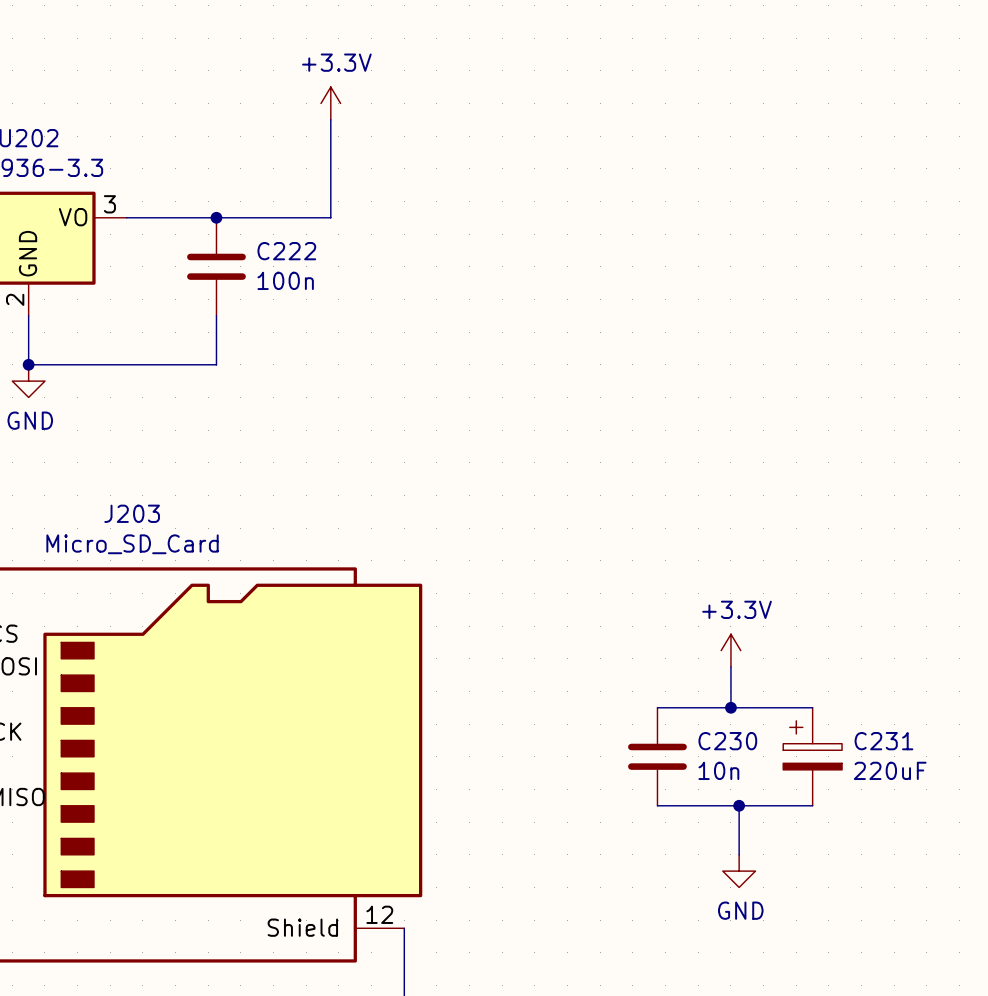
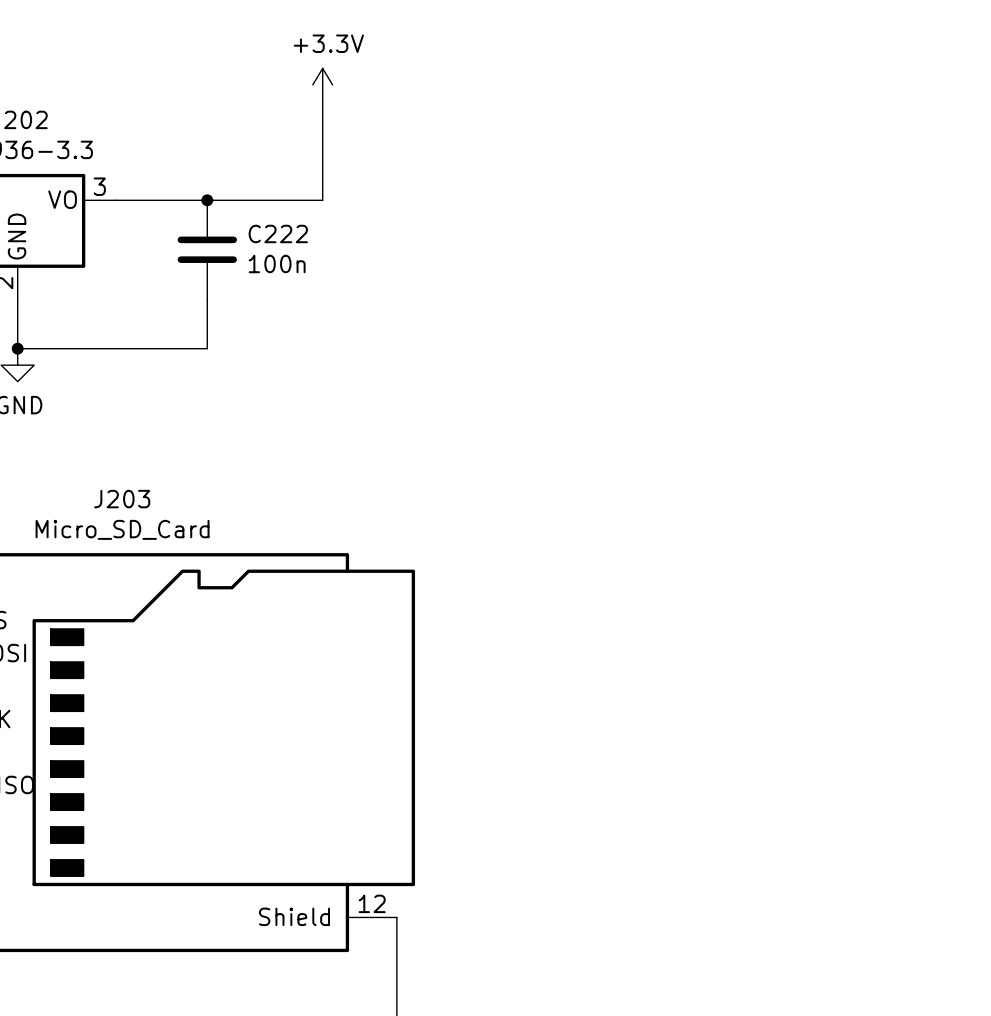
power symbol: +3.3V (730, 650) -> none
wire: (730, 666) (730, 707) -> none
wire: (657, 707) (812, 707) -> none
junction: (730, 707) -> none
C230: 10n (657, 756) -> none
C231: 220uF (812, 756) -> none
wire: (657, 805) (812, 805) -> none
wire: (739, 805) (739, 854) -> none
junction: (739, 805) -> none
power symbol: GND (739, 871) -> none

